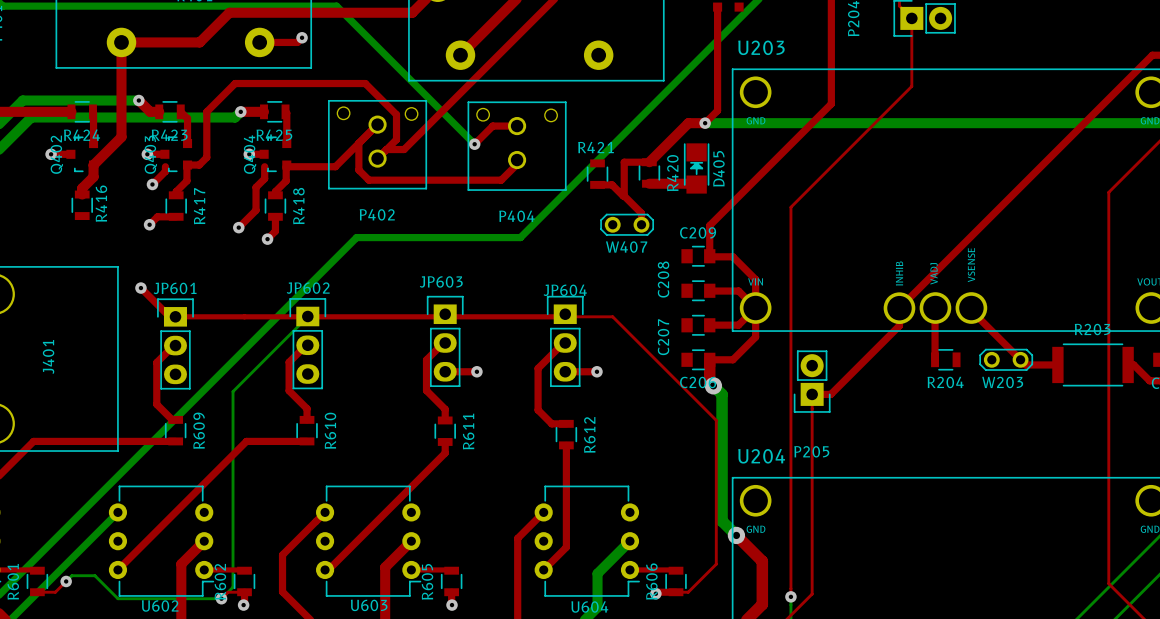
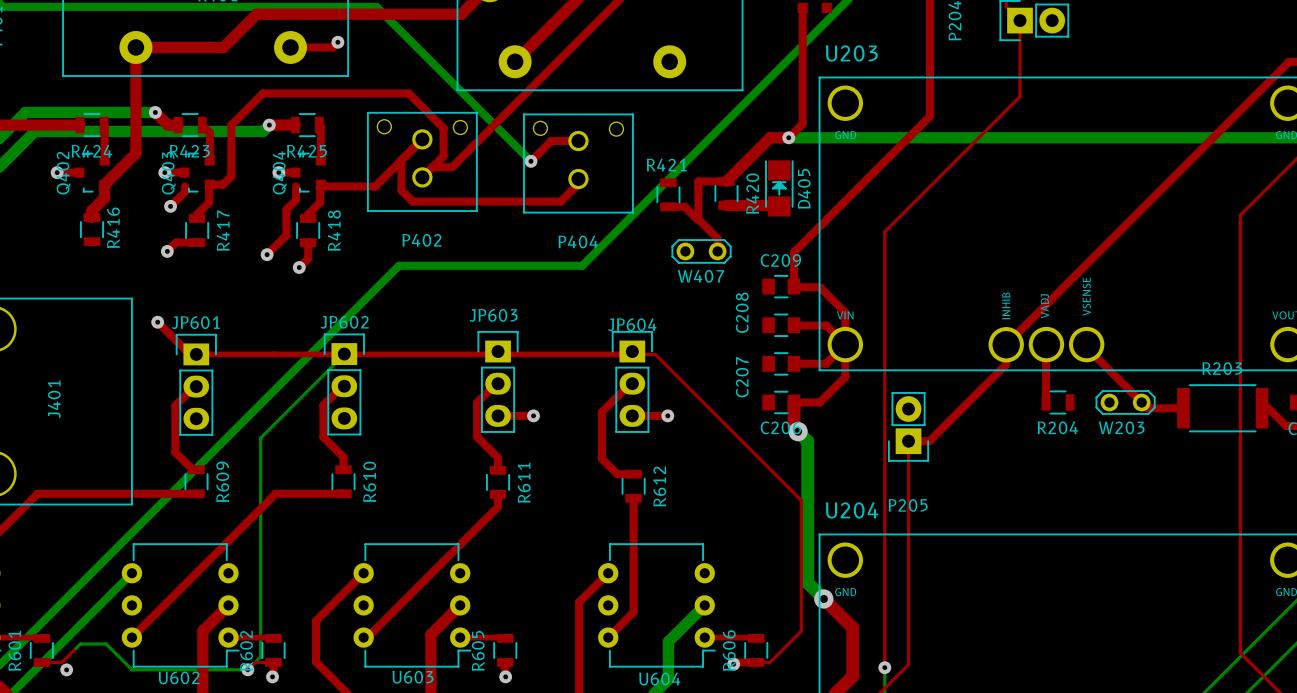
top track: (585, 316) (612, 316) (716, 420) (716, 447) -> (655, 354) (801, 500)
via position: (66, 581) -> (66, 669)

